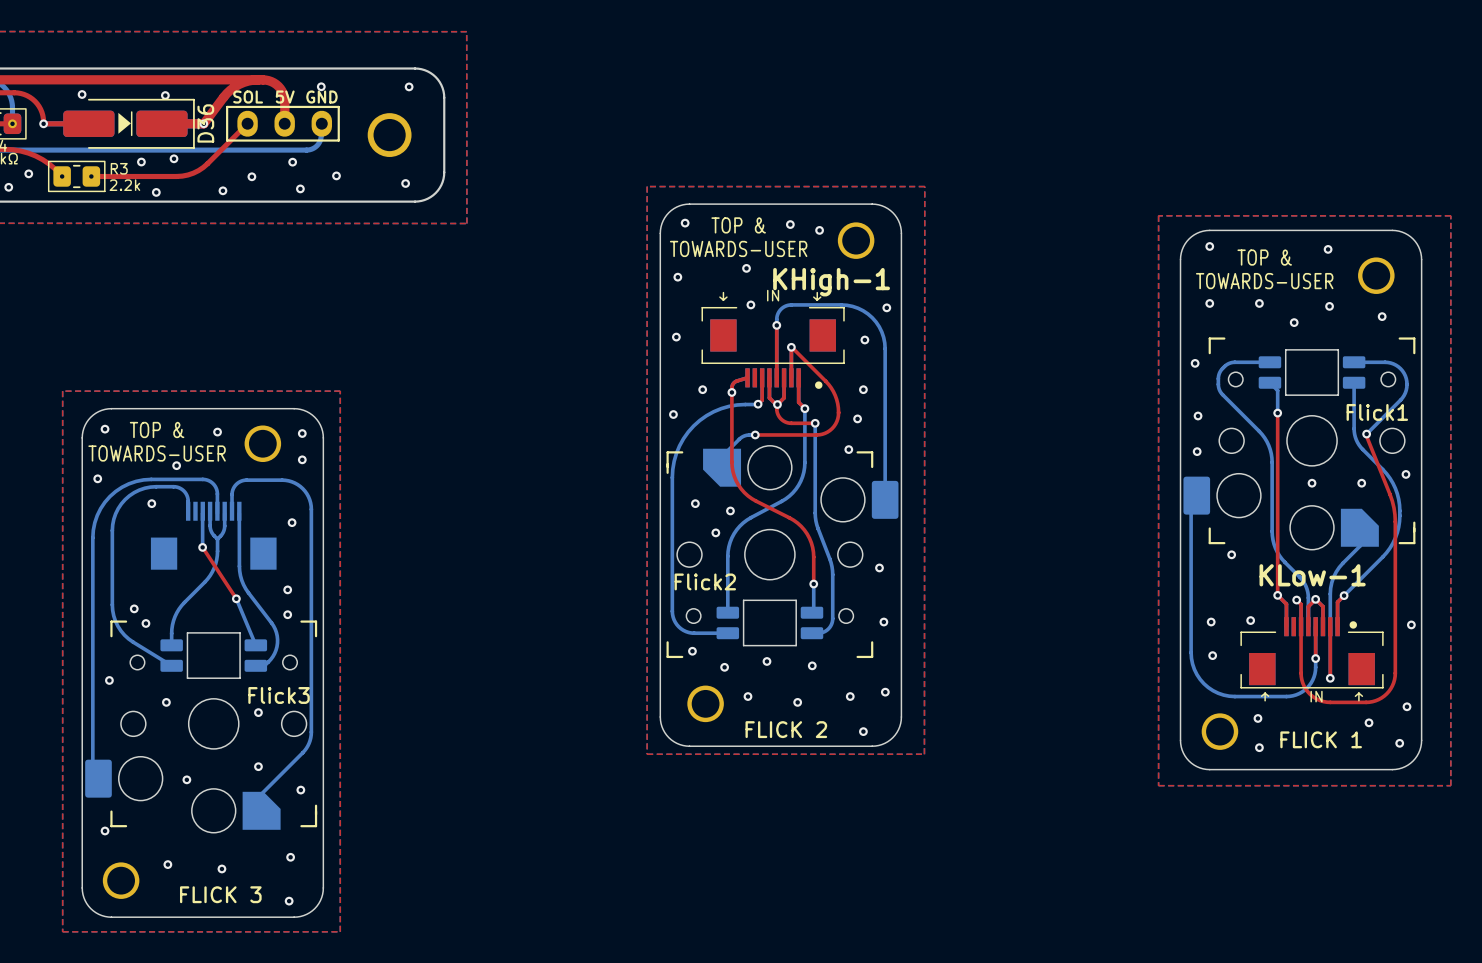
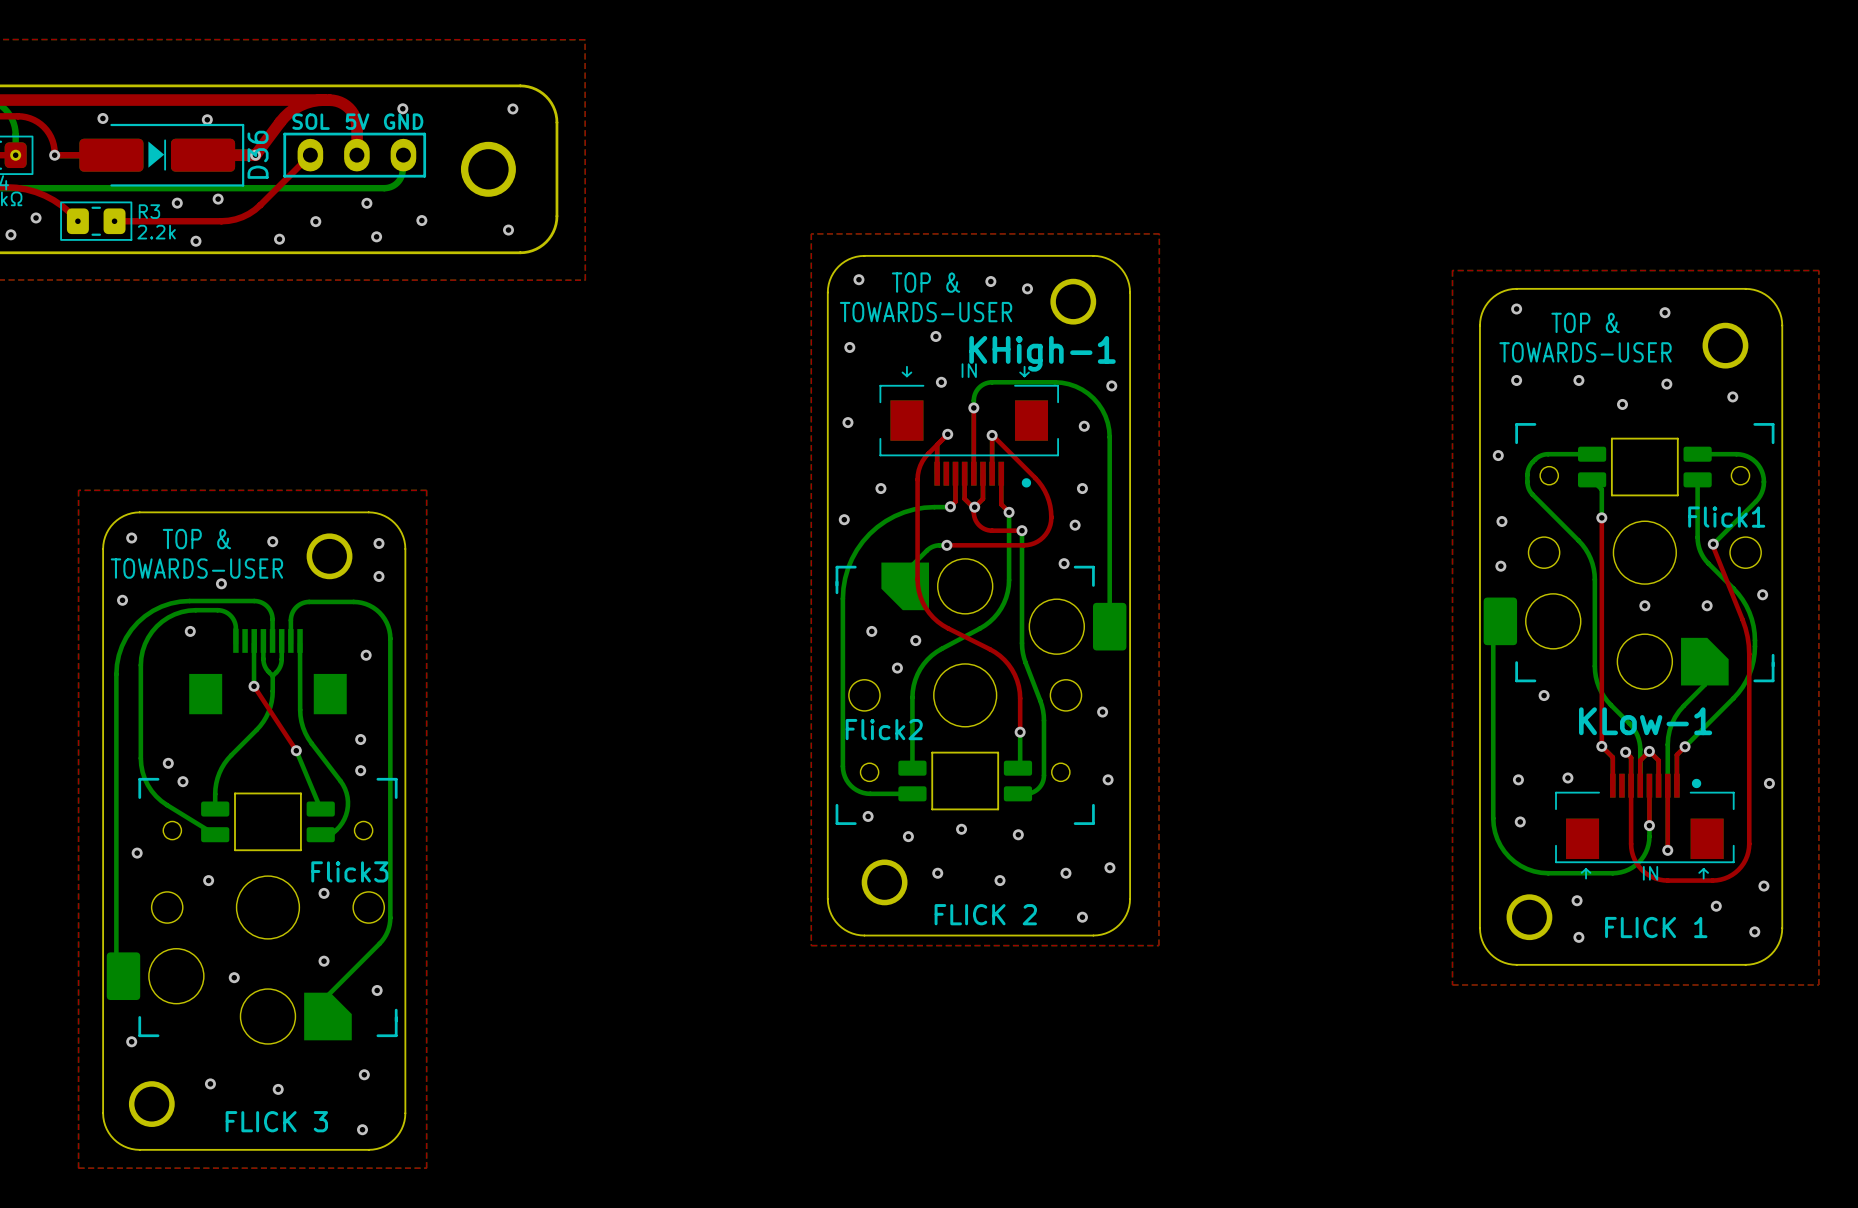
top track: none -> (937, 444) (937, 473)
top track: (747, 377) (735, 381) (731, 388) -> (947, 434) (922, 461) (917, 474) (917, 486)
via position: (731, 392) -> (947, 434)

